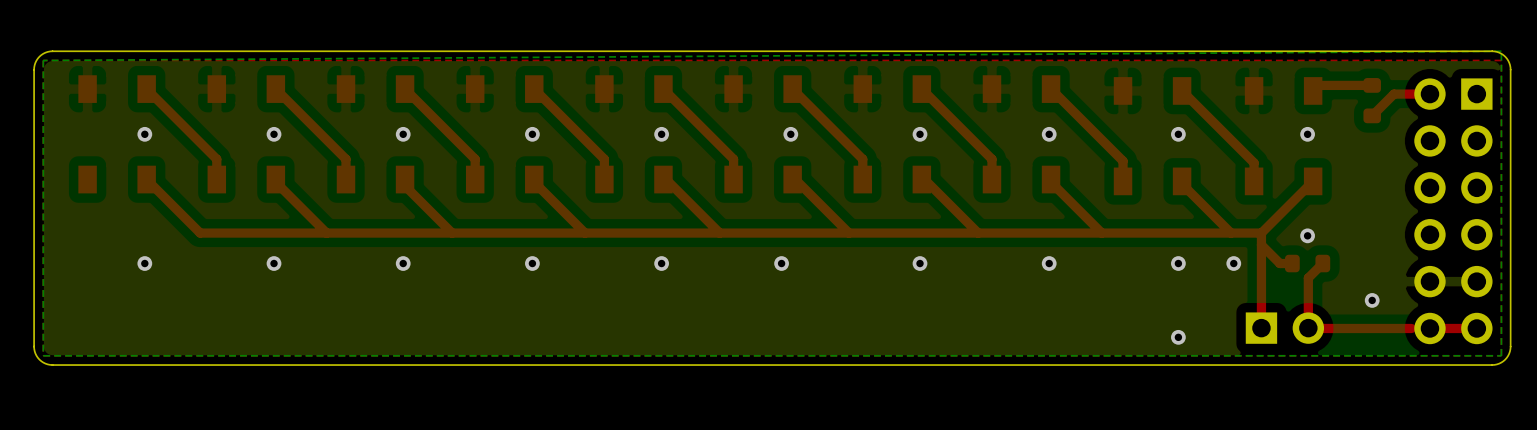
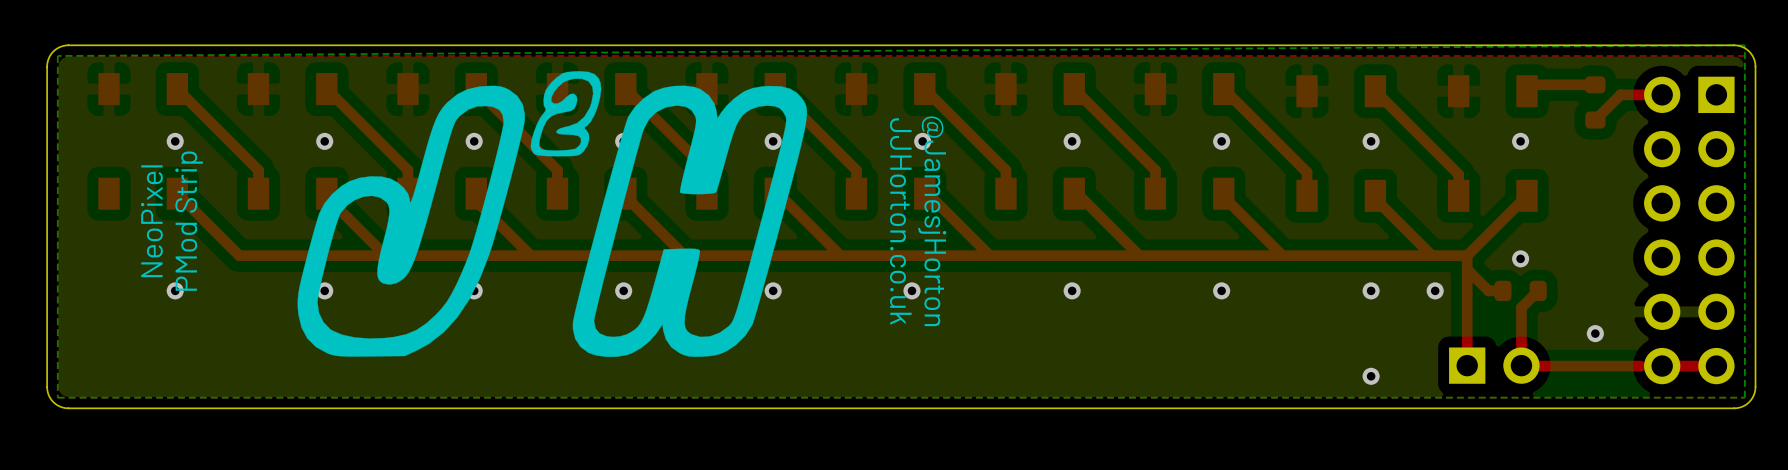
drawing: none -> [297, 71, 807, 357]
text: none -> NeoPixel (151, 221)
text: none -> PMod Strip (189, 221)
text: none -> JJHorton.co.uk (900, 221)
text: none -> @JamesjHorton (932, 221)

